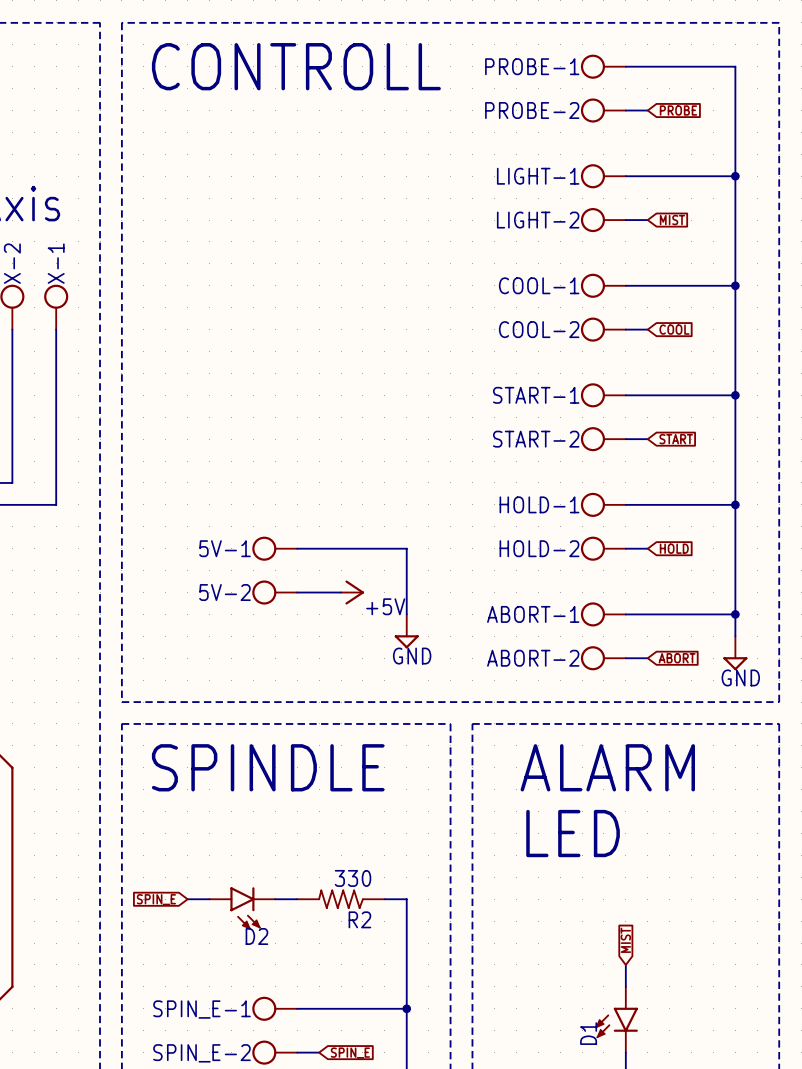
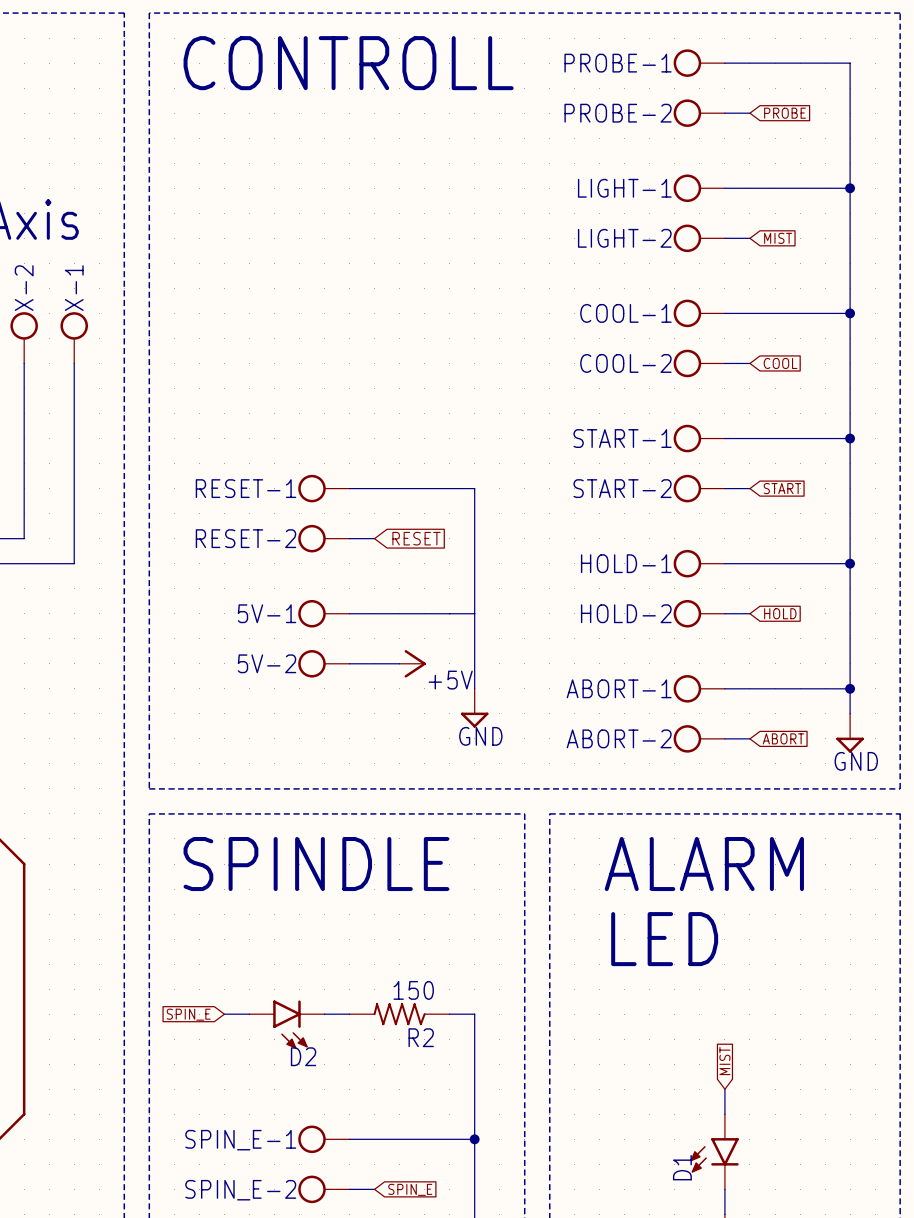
RESET-1: none -> (323, 488)
wire: none -> (349, 488) (474, 488) (474, 613)
RESET-2: none -> (323, 538)
wire: none -> (349, 538) (374, 538)
global label: none -> RESET (416, 538)
R2 value: 330 (353, 878) -> 150 (413, 990)

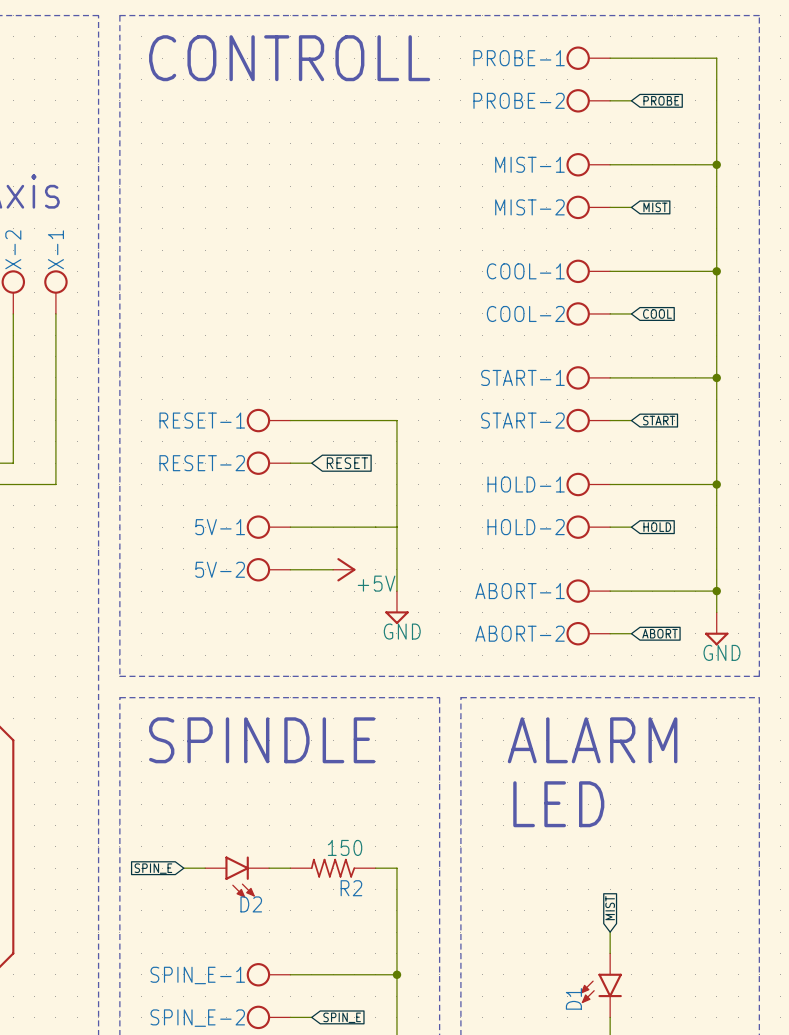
LIGHT-1 name: LIGHT-1 (624, 188) -> MIST-1 (529, 164)
LIGHT-2 name: LIGHT-2 (624, 238) -> MIST-2 (529, 207)

